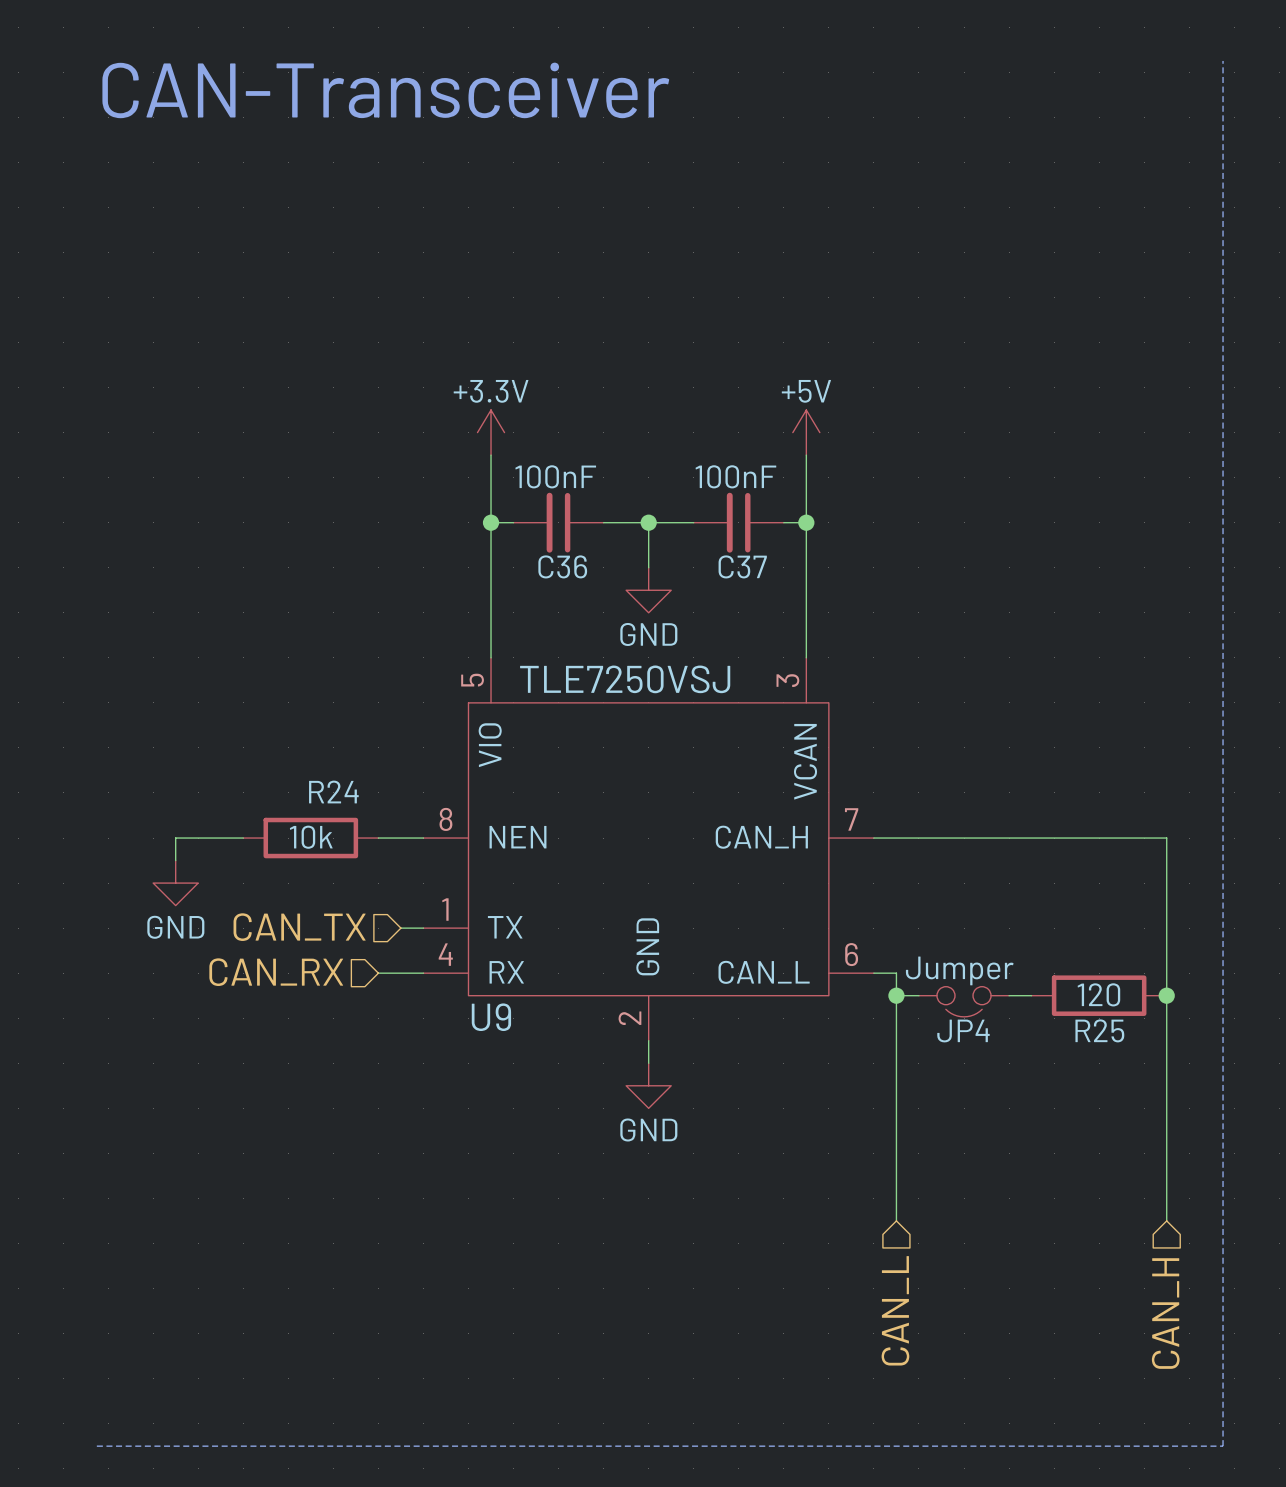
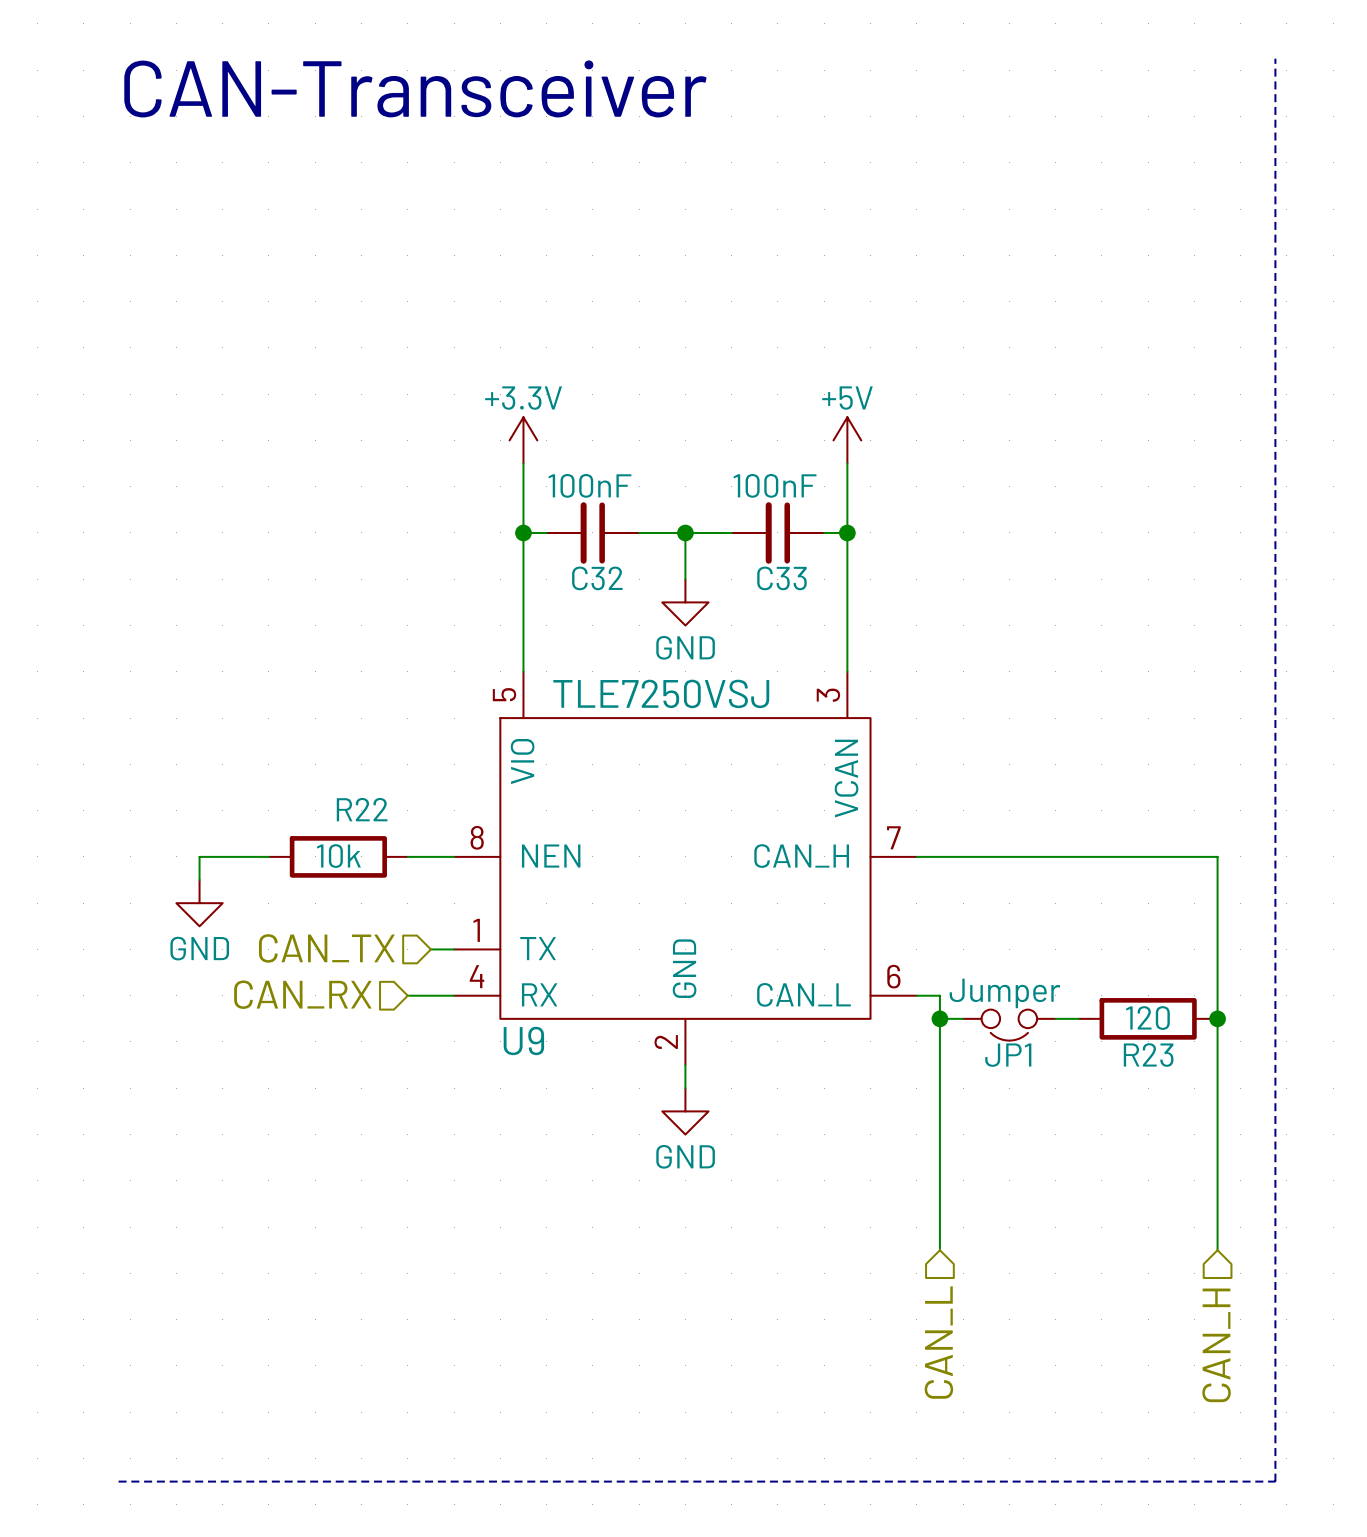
C36 name: C36 (562, 566) -> C32 (597, 578)
C37 name: C37 (742, 566) -> C33 (782, 578)
R24 name: R24 (333, 792) -> R22 (362, 809)
R25 name: R25 (1099, 1030) -> R23 (1148, 1055)
JP4 name: JP4 (963, 1031) -> JP1 (1008, 1055)

